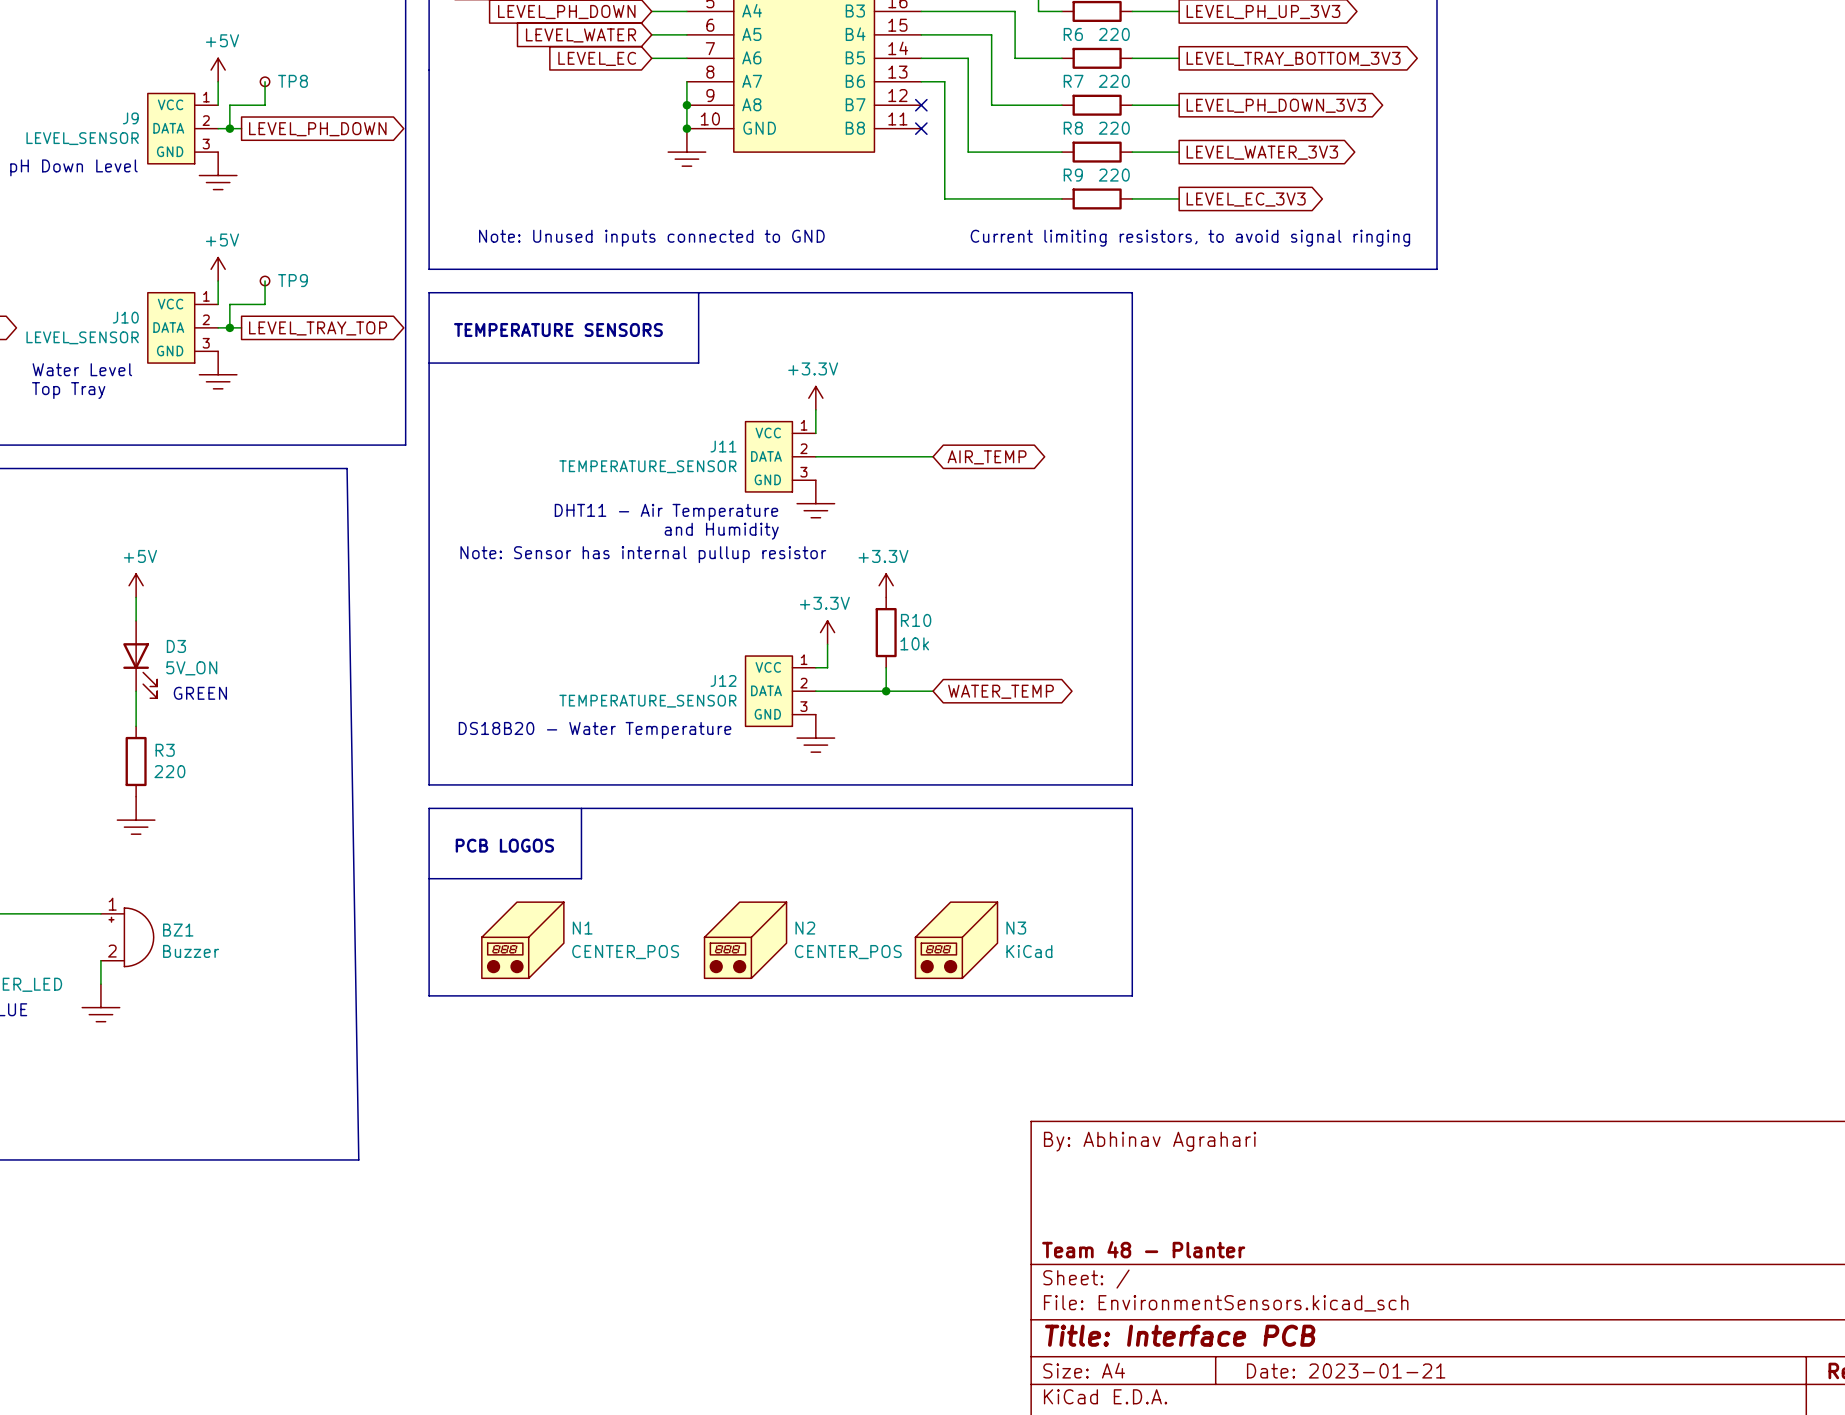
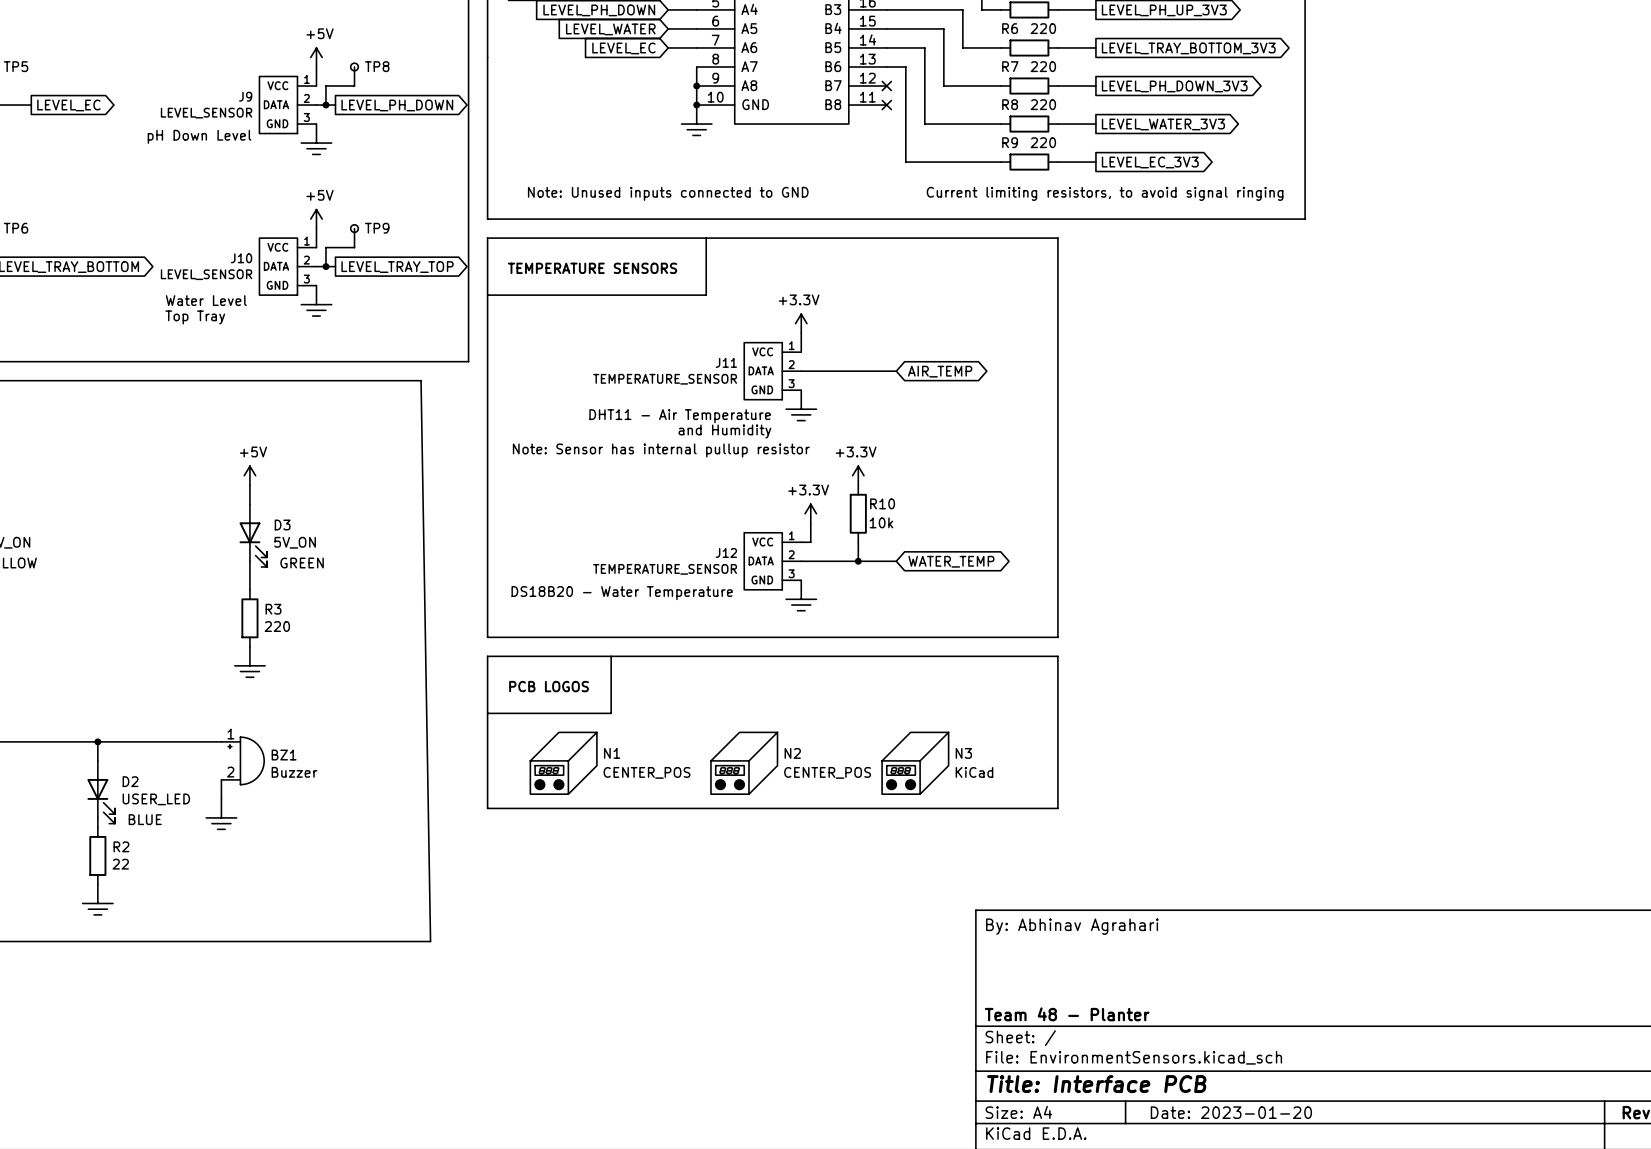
title block: Date: 2023-01-21 (1346, 1370) -> Date: 2023-01-20 (1231, 1112)

